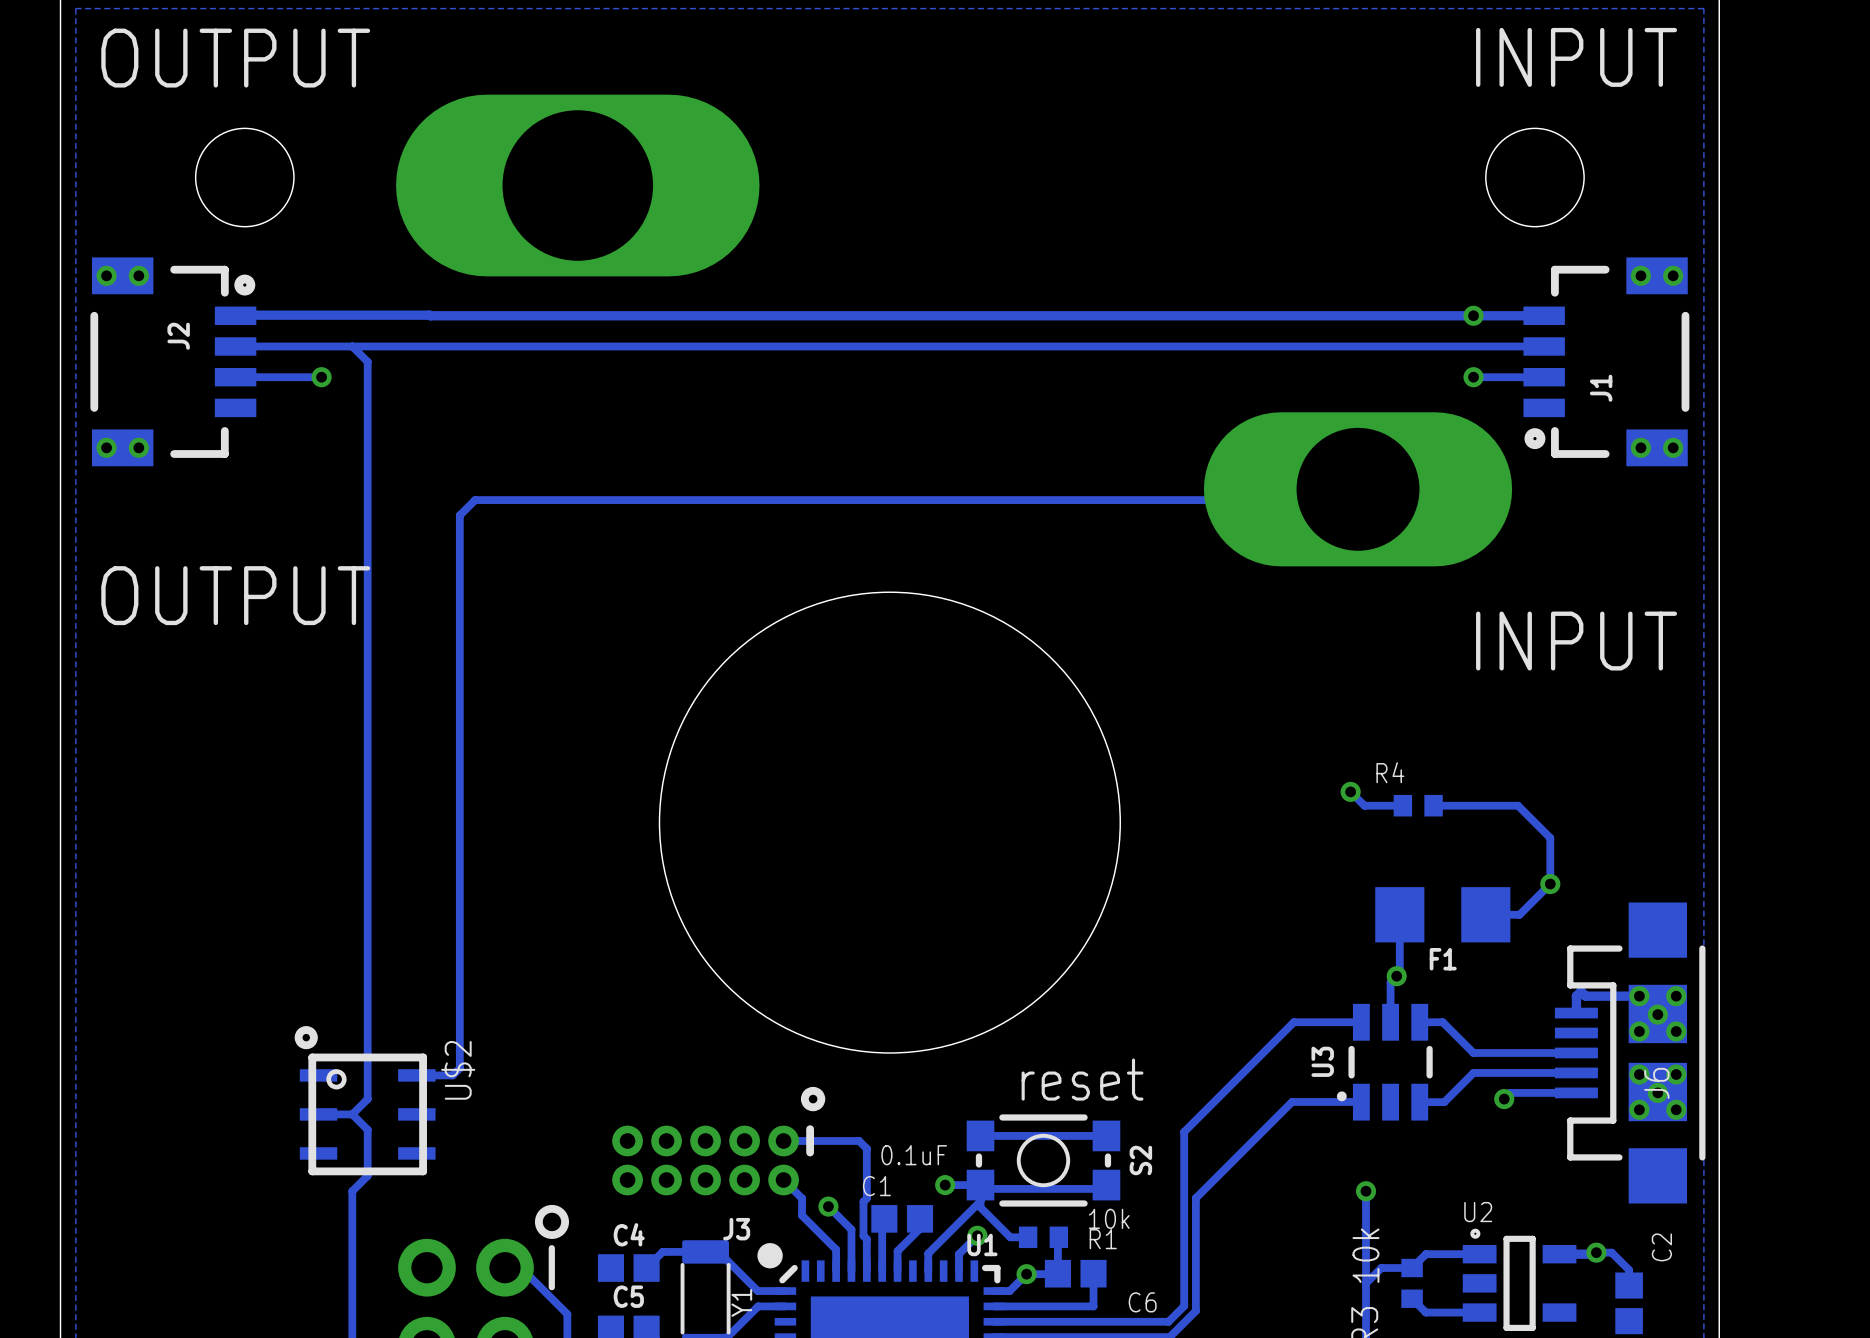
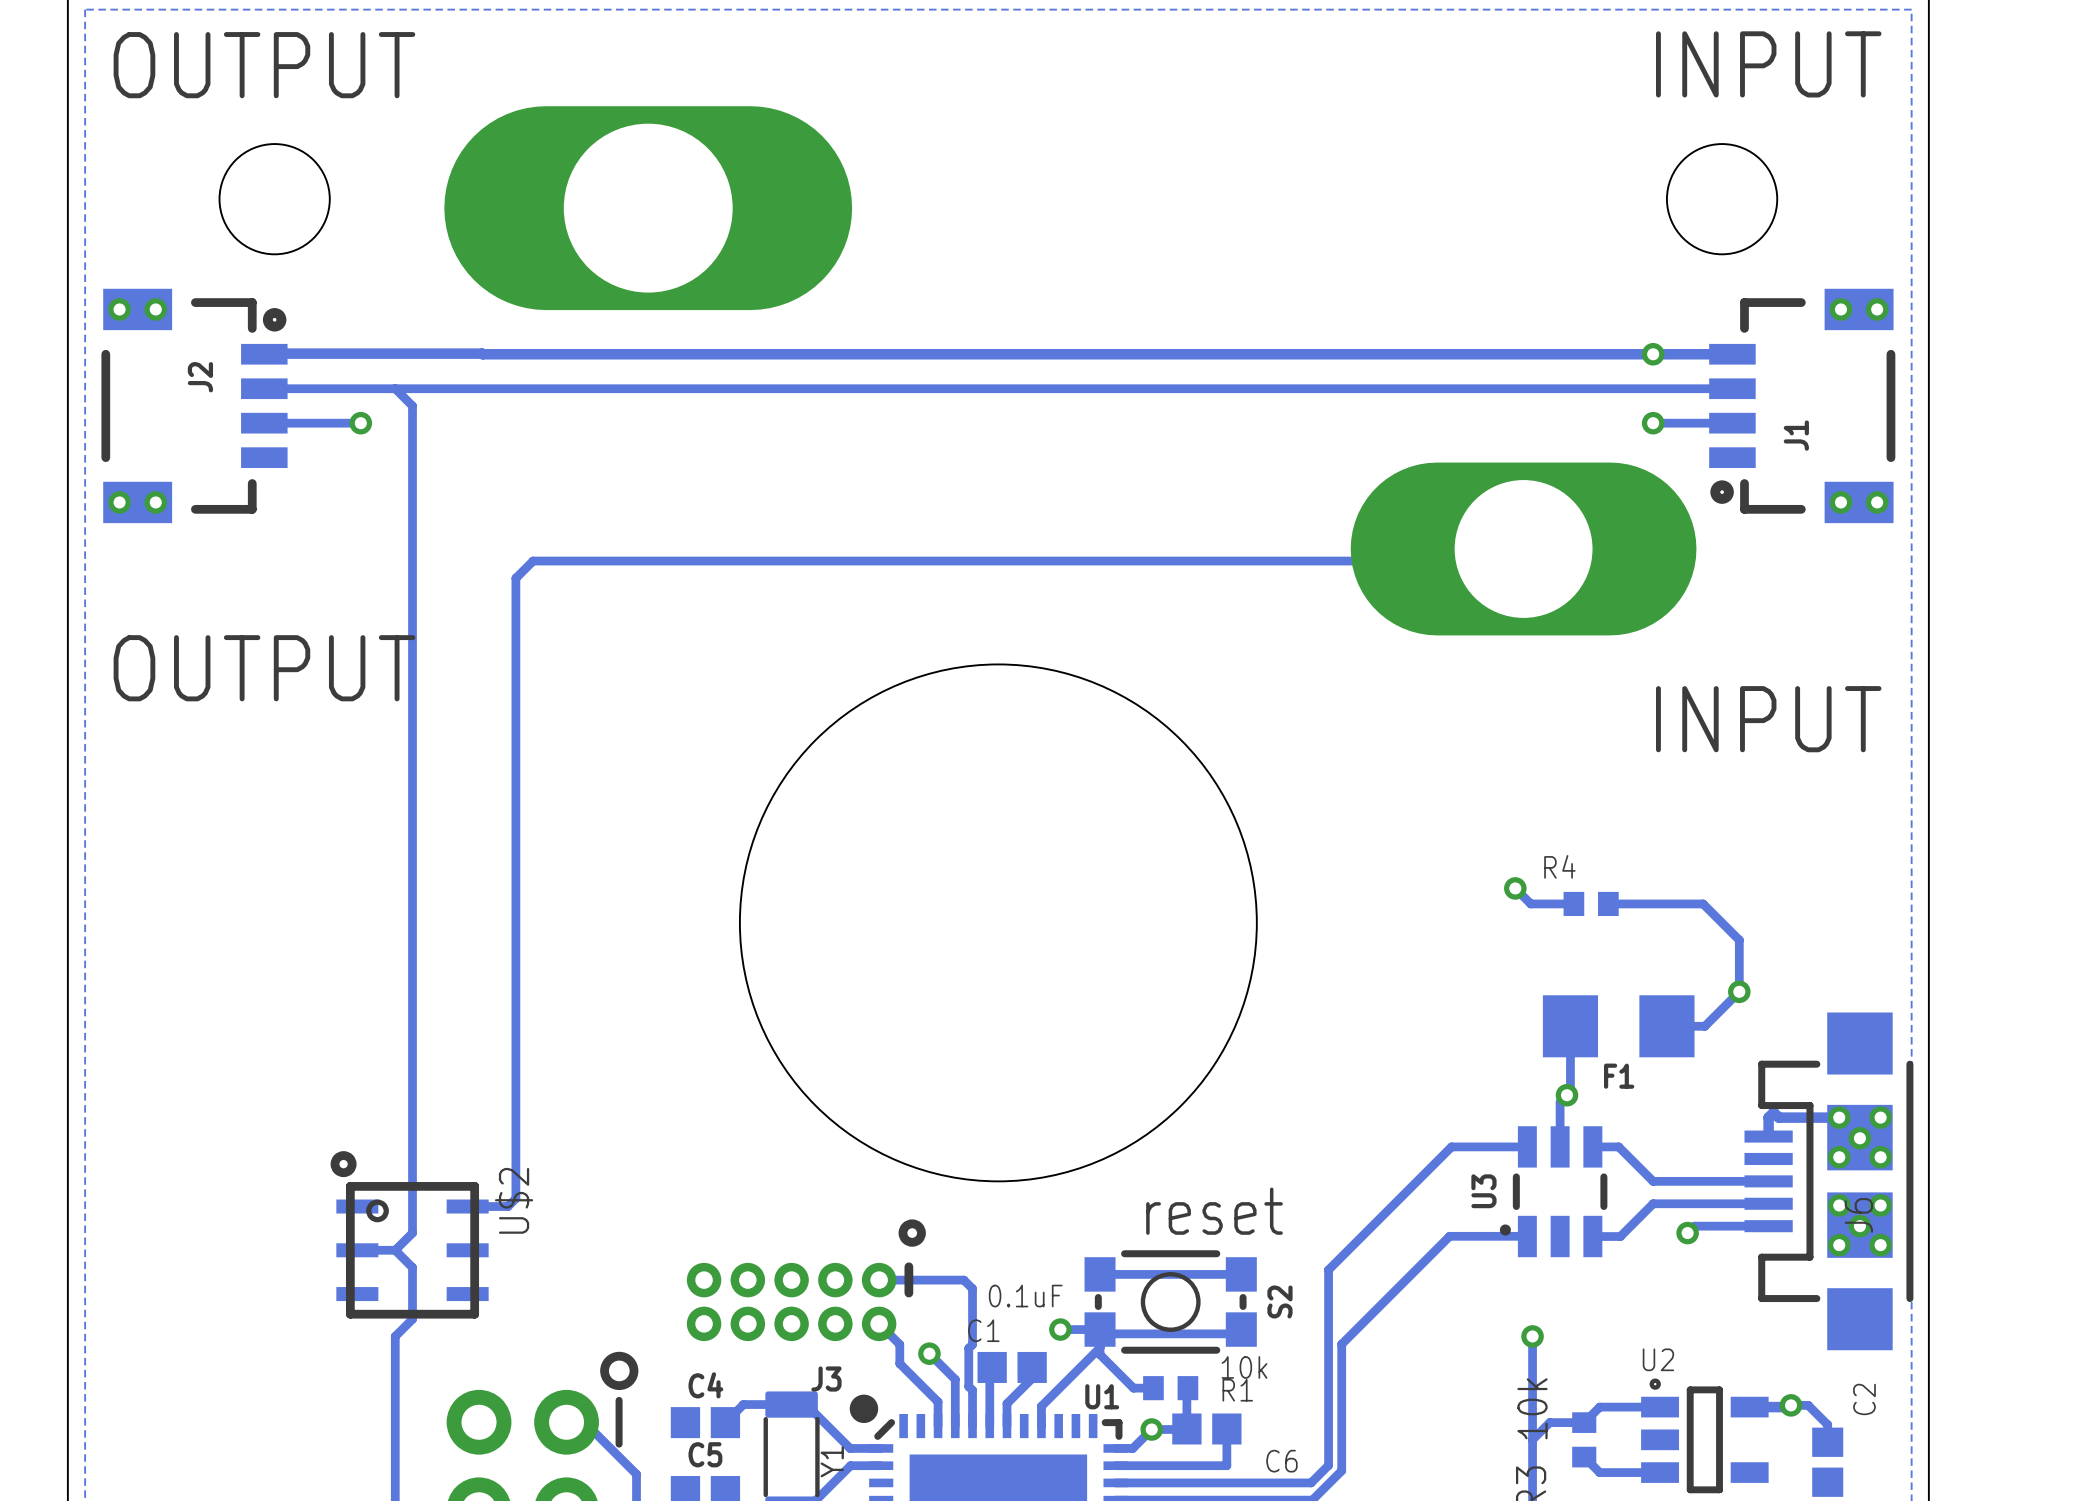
track: (977, 1235) (958, 1254) (958, 1271) -> none
via: (977, 1235) -> none

